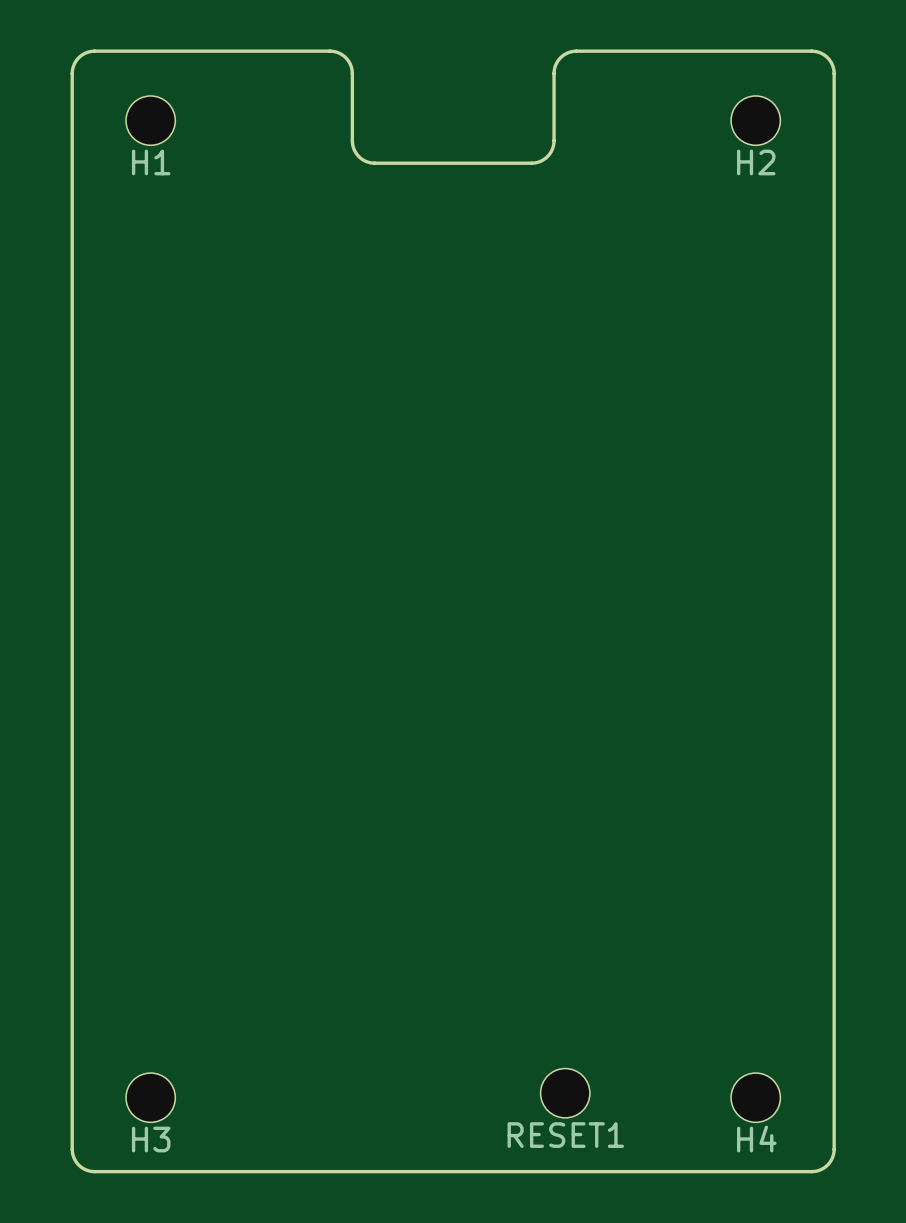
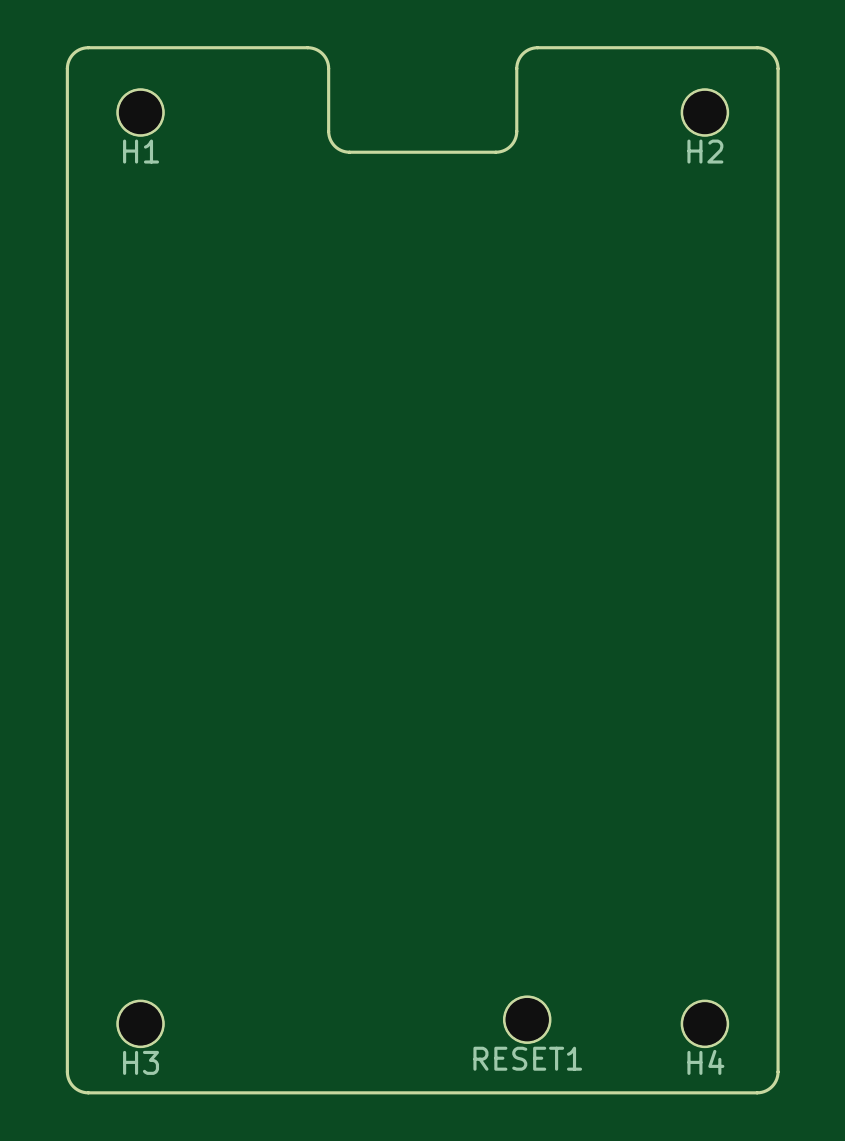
H1 footprint: [126, 95, 176, 146] -> [116, 88, 165, 137]
H2 footprint: [731, 95, 781, 146] -> [680, 88, 730, 137]
RESET1 footprint: [540, 1068, 590, 1118] -> [502, 995, 552, 1044]
H3 footprint: [126, 1073, 176, 1123] -> [116, 999, 165, 1049]
H4 footprint: [731, 1073, 781, 1123] -> [680, 999, 730, 1049]

